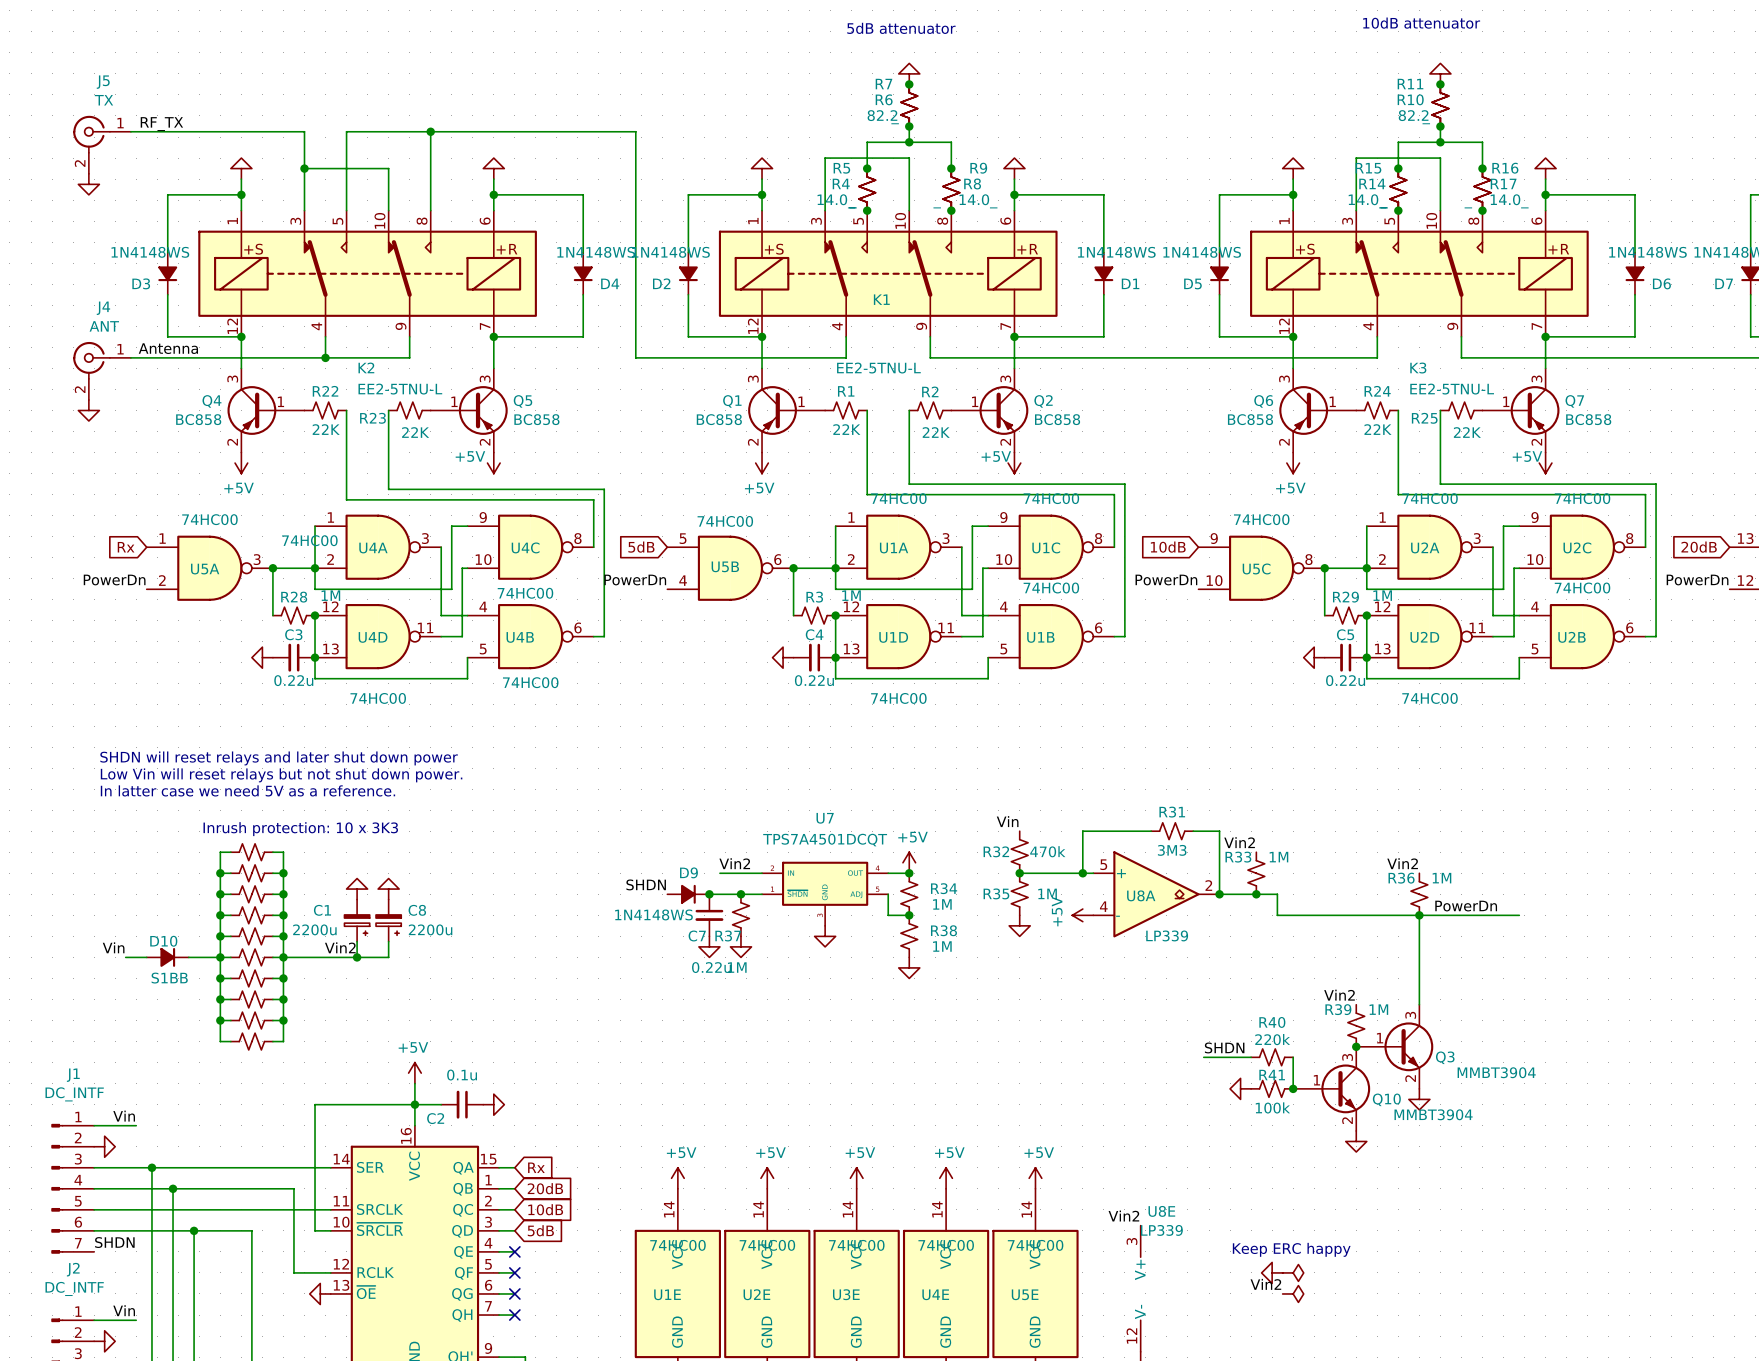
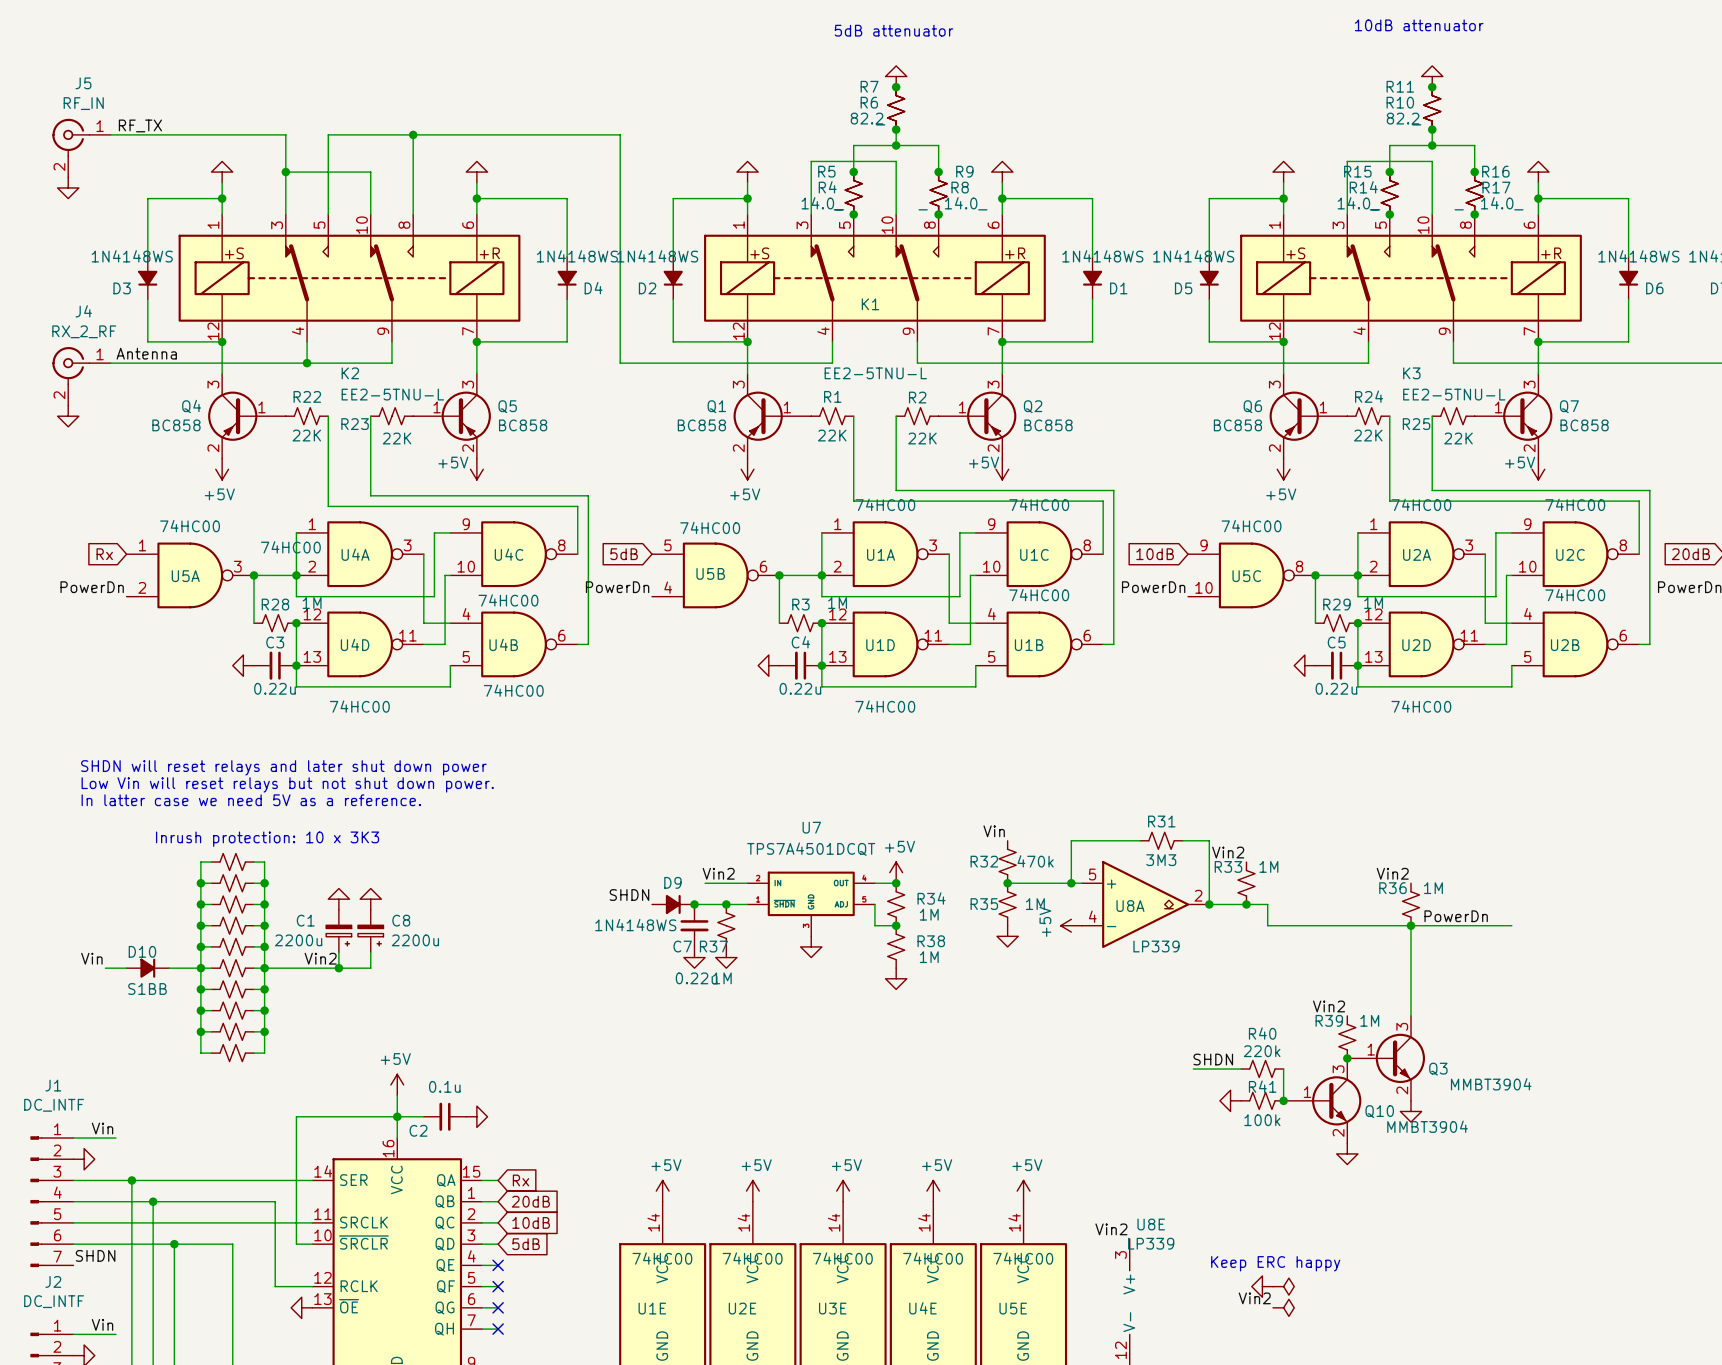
J5 value: TX (103, 100) -> RF_IN (83, 103)
J4 value: ANT (104, 326) -> RX_2_RF (84, 331)

